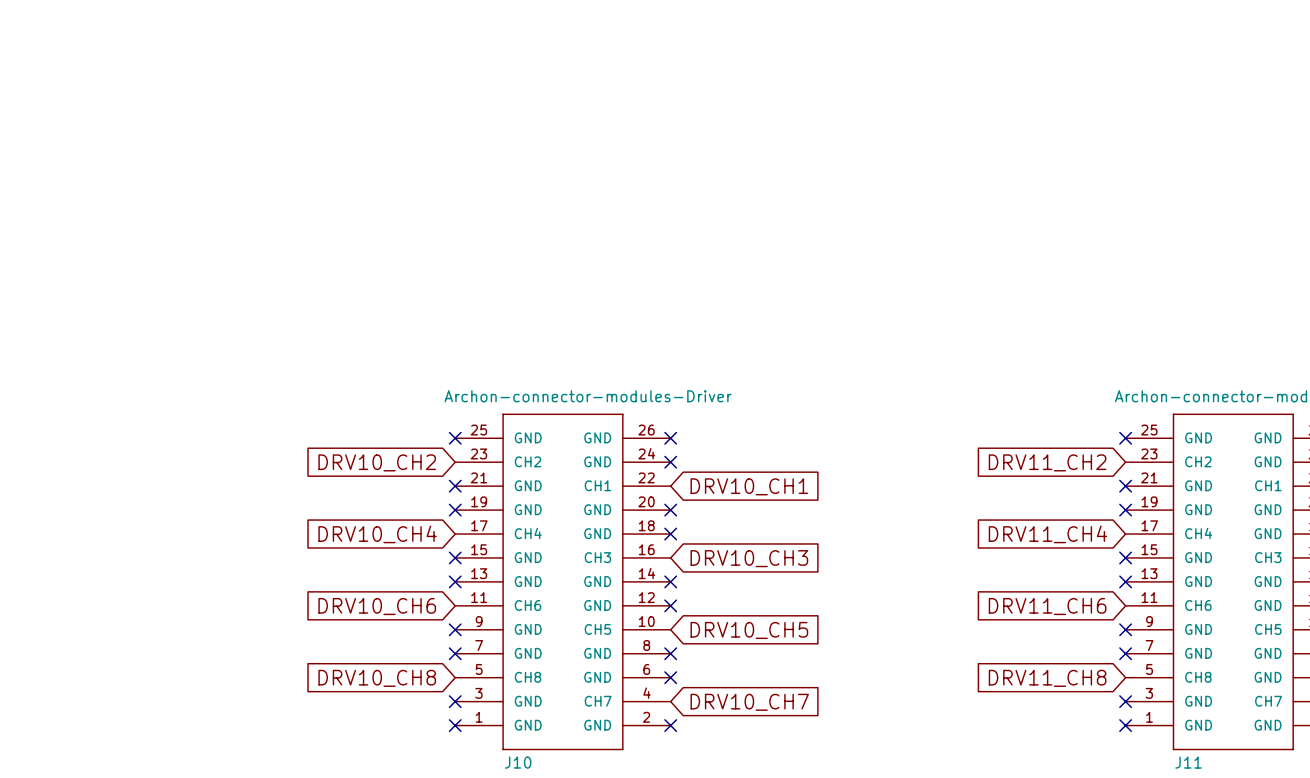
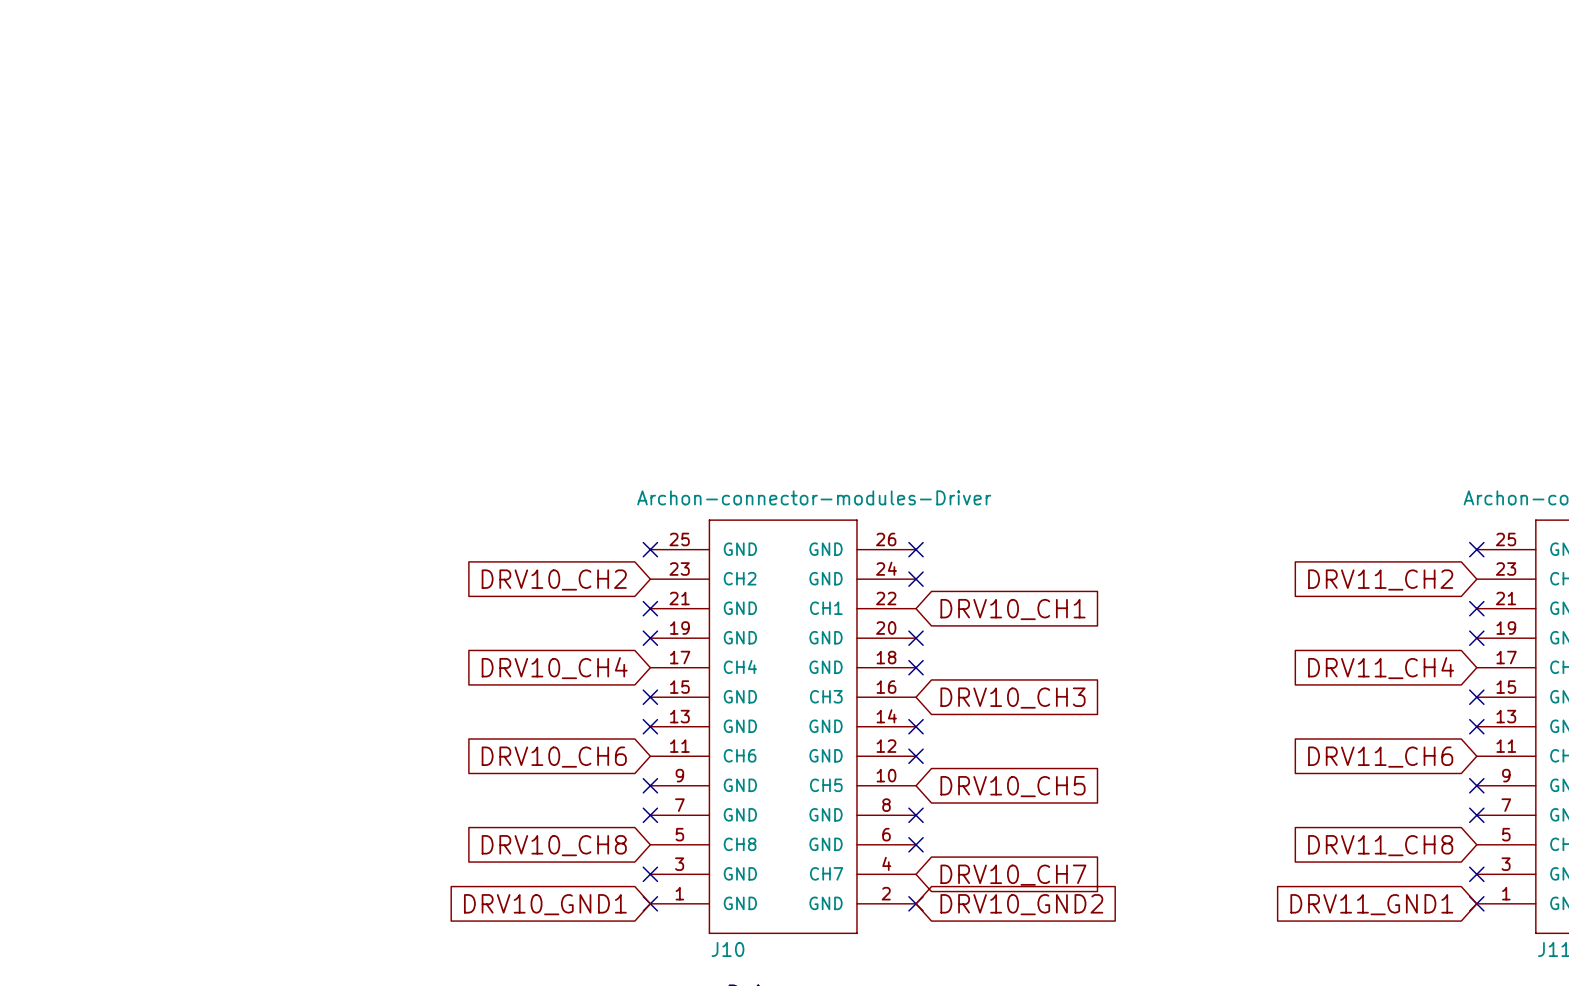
global label: none -> DRV10_GND1 (545, 904)
global label: none -> DRV10_GND2 (1021, 904)
global label: none -> DRV11_GND1 (1371, 904)

